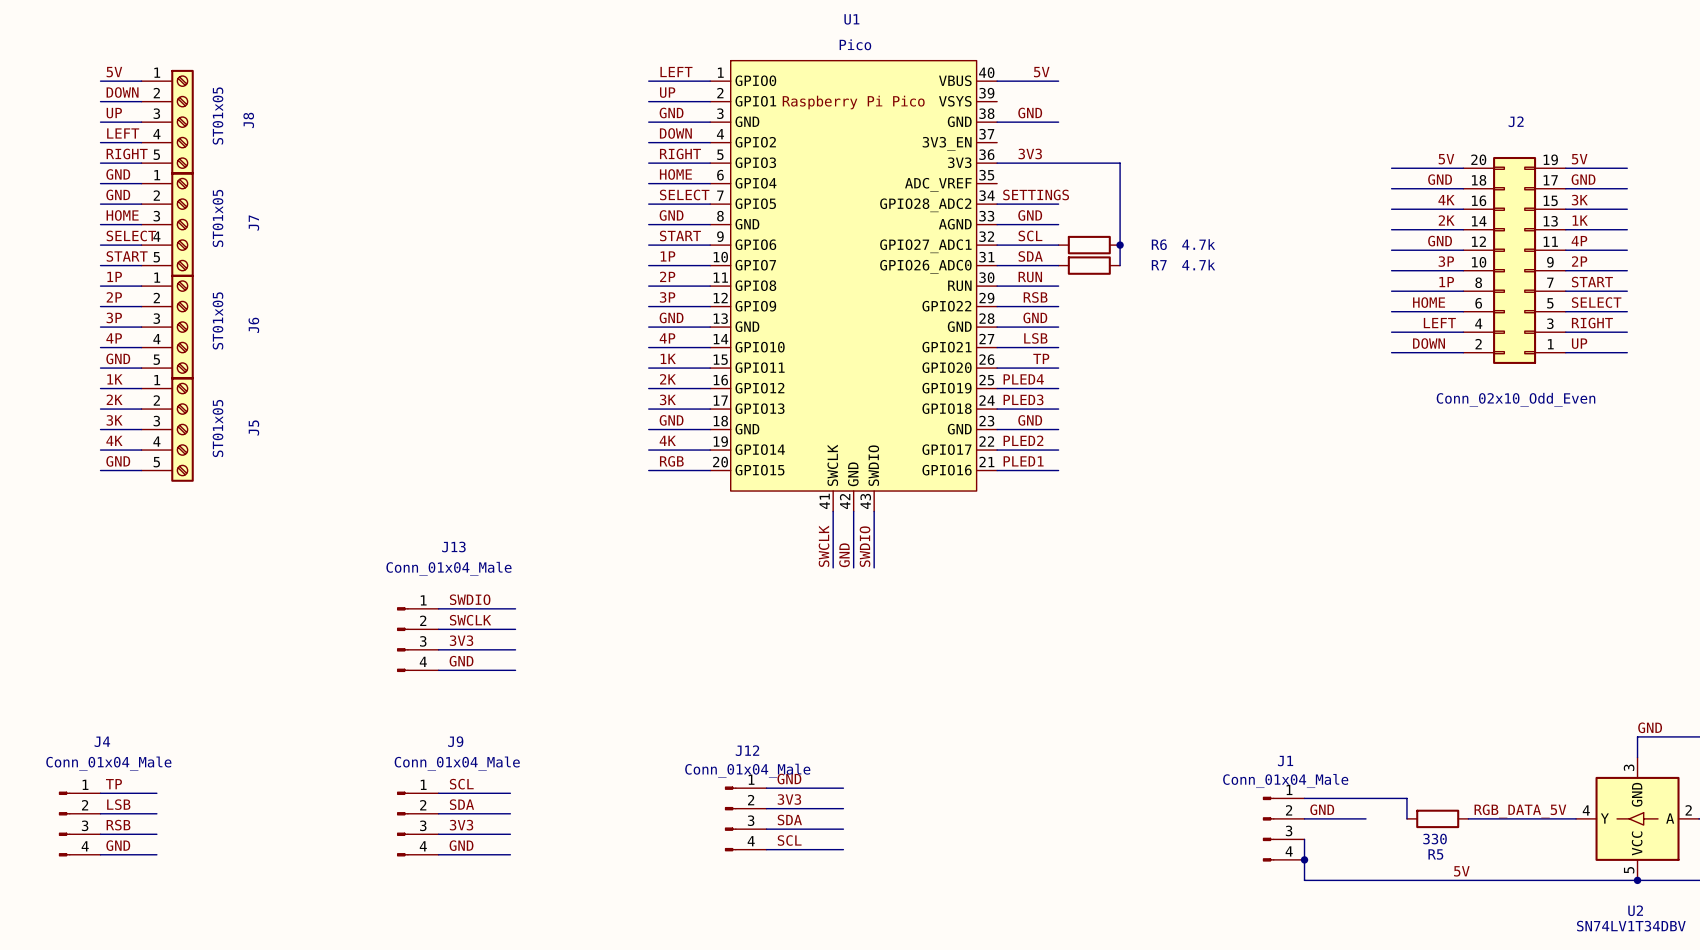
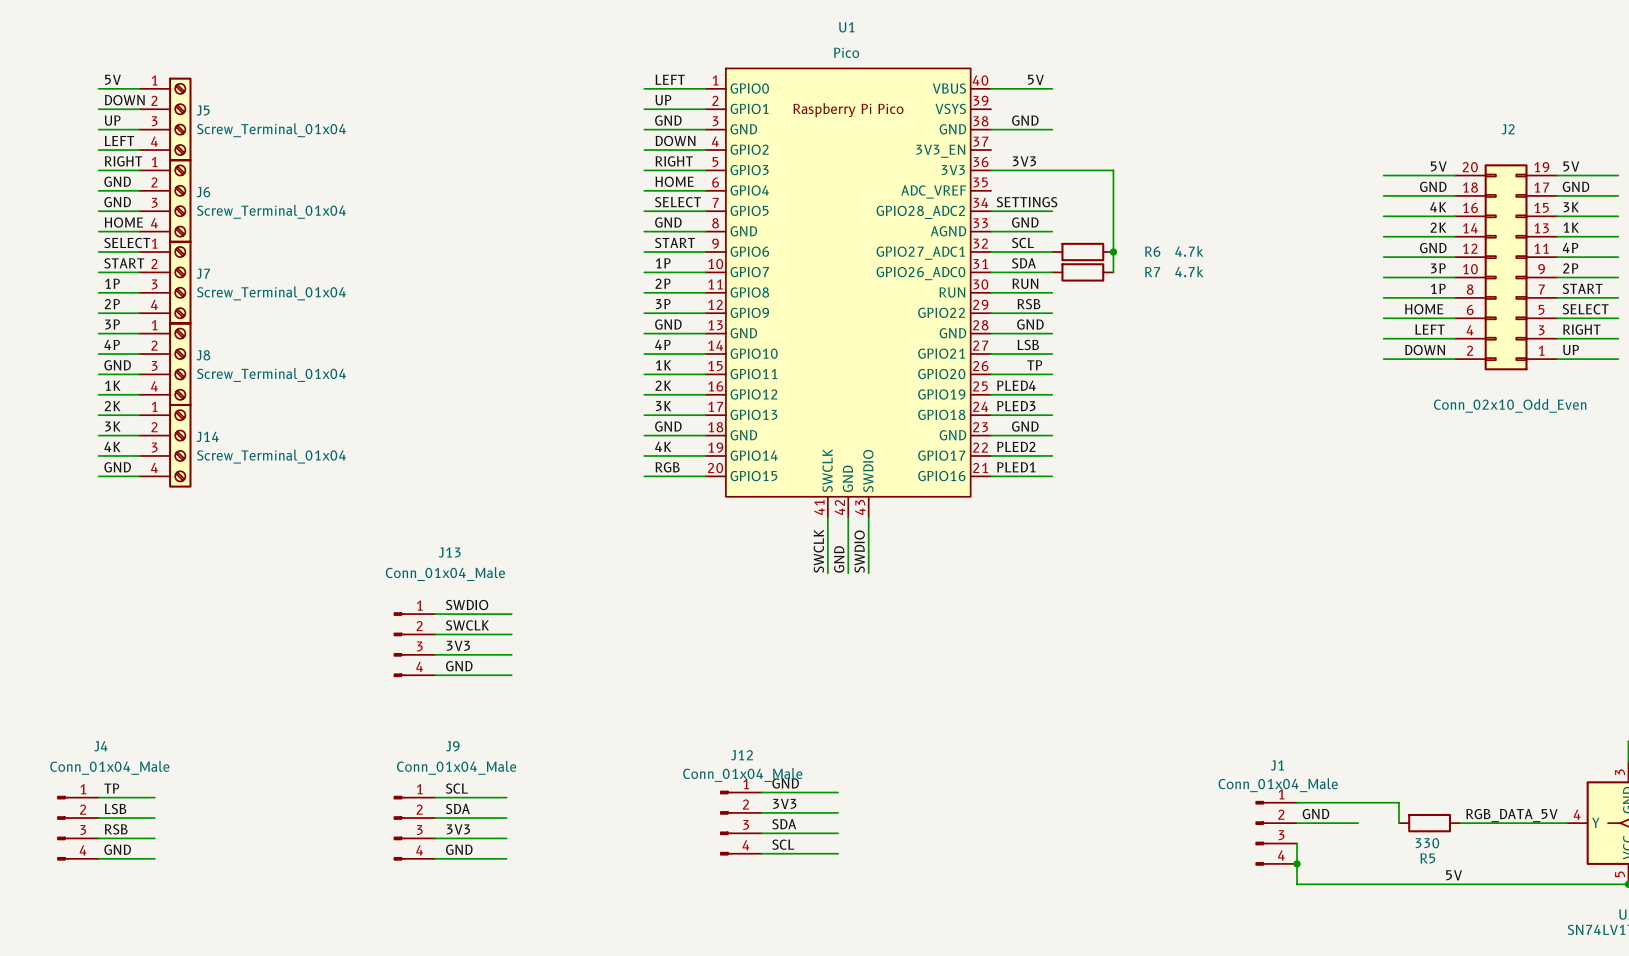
J8 symbol: [141, 69, 194, 175] -> [139, 322, 192, 407]
J8 value: ST01x05 (217, 115) -> Screw_Terminal_01x04 (271, 375)
J8 name position: J8 (248, 120) -> J8 (203, 355)
J7 symbol: [141, 172, 194, 277] -> [139, 240, 192, 325]
J7 value: ST01x05 (217, 218) -> Screw_Terminal_01x04 (271, 293)
J7 name position: J7 (253, 222) -> J7 (203, 273)
J6 symbol: [141, 274, 194, 380] -> [139, 159, 192, 243]
J6 value: ST01x05 (217, 320) -> Screw_Terminal_01x04 (271, 211)
J6 name position: J6 (253, 325) -> J6 (203, 192)
J5 symbol: [141, 377, 194, 482] -> [139, 77, 192, 162]
J5 name position: J5 (253, 427) -> J5 (203, 110)
J5 value: ST01x05 (217, 428) -> Screw_Terminal_01x04 (271, 130)
J14: none -> Screw_Terminal_01x04 (165, 445)

